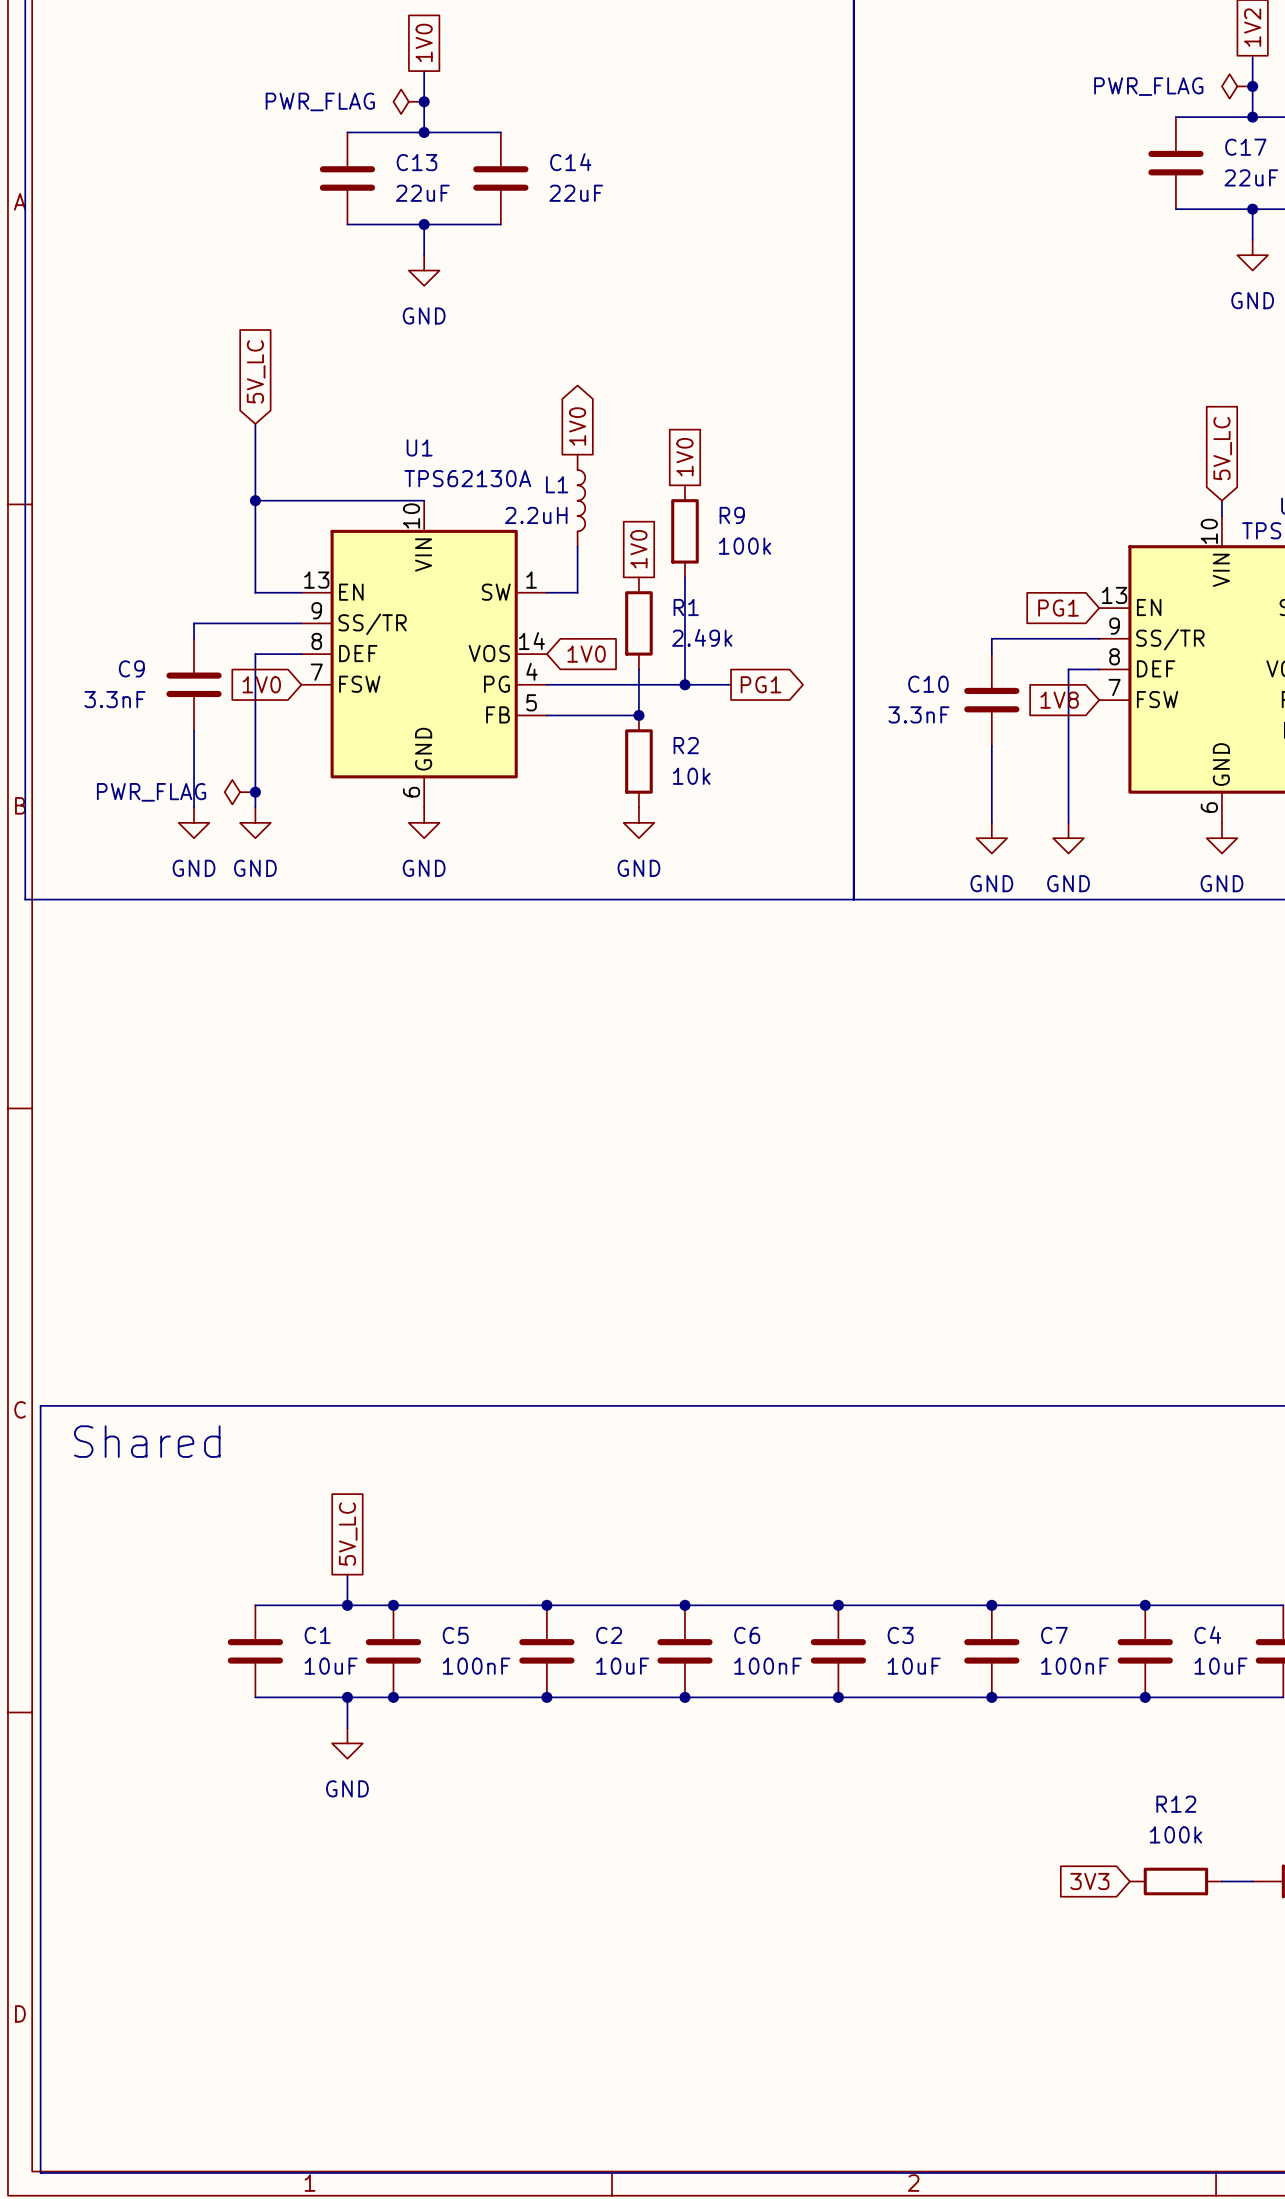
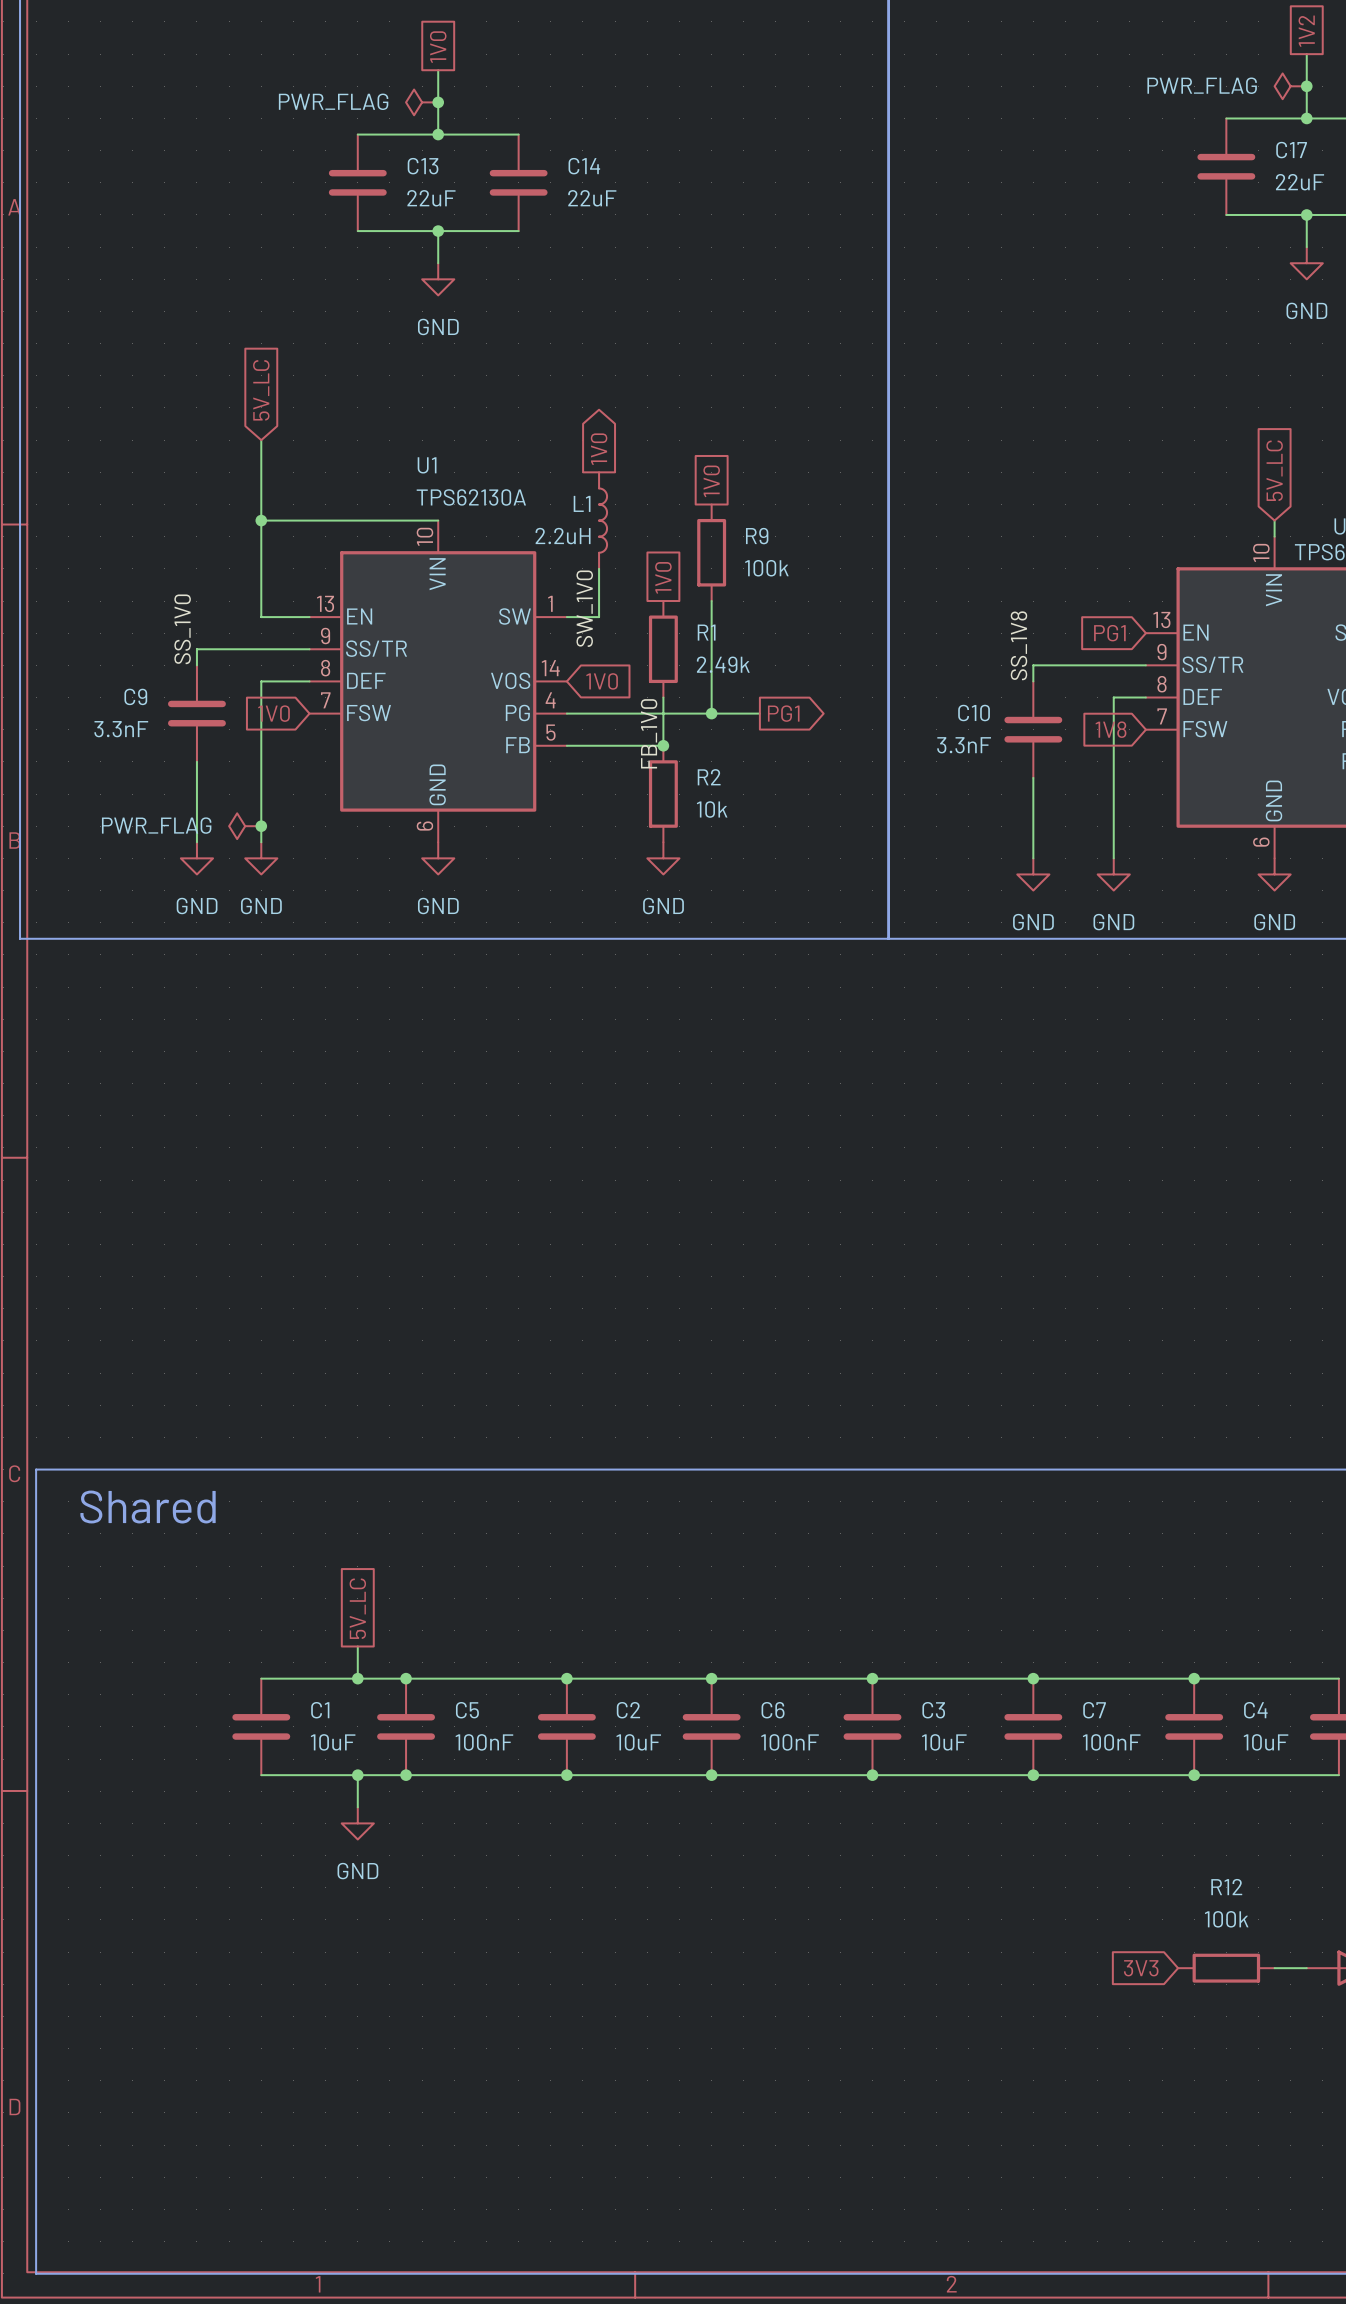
label: none -> SW_1V0 (584, 608)
label: none -> SS_1V0 (182, 629)
label: none -> SS_1V8 (1018, 645)
label: none -> FB_1V0 (649, 733)

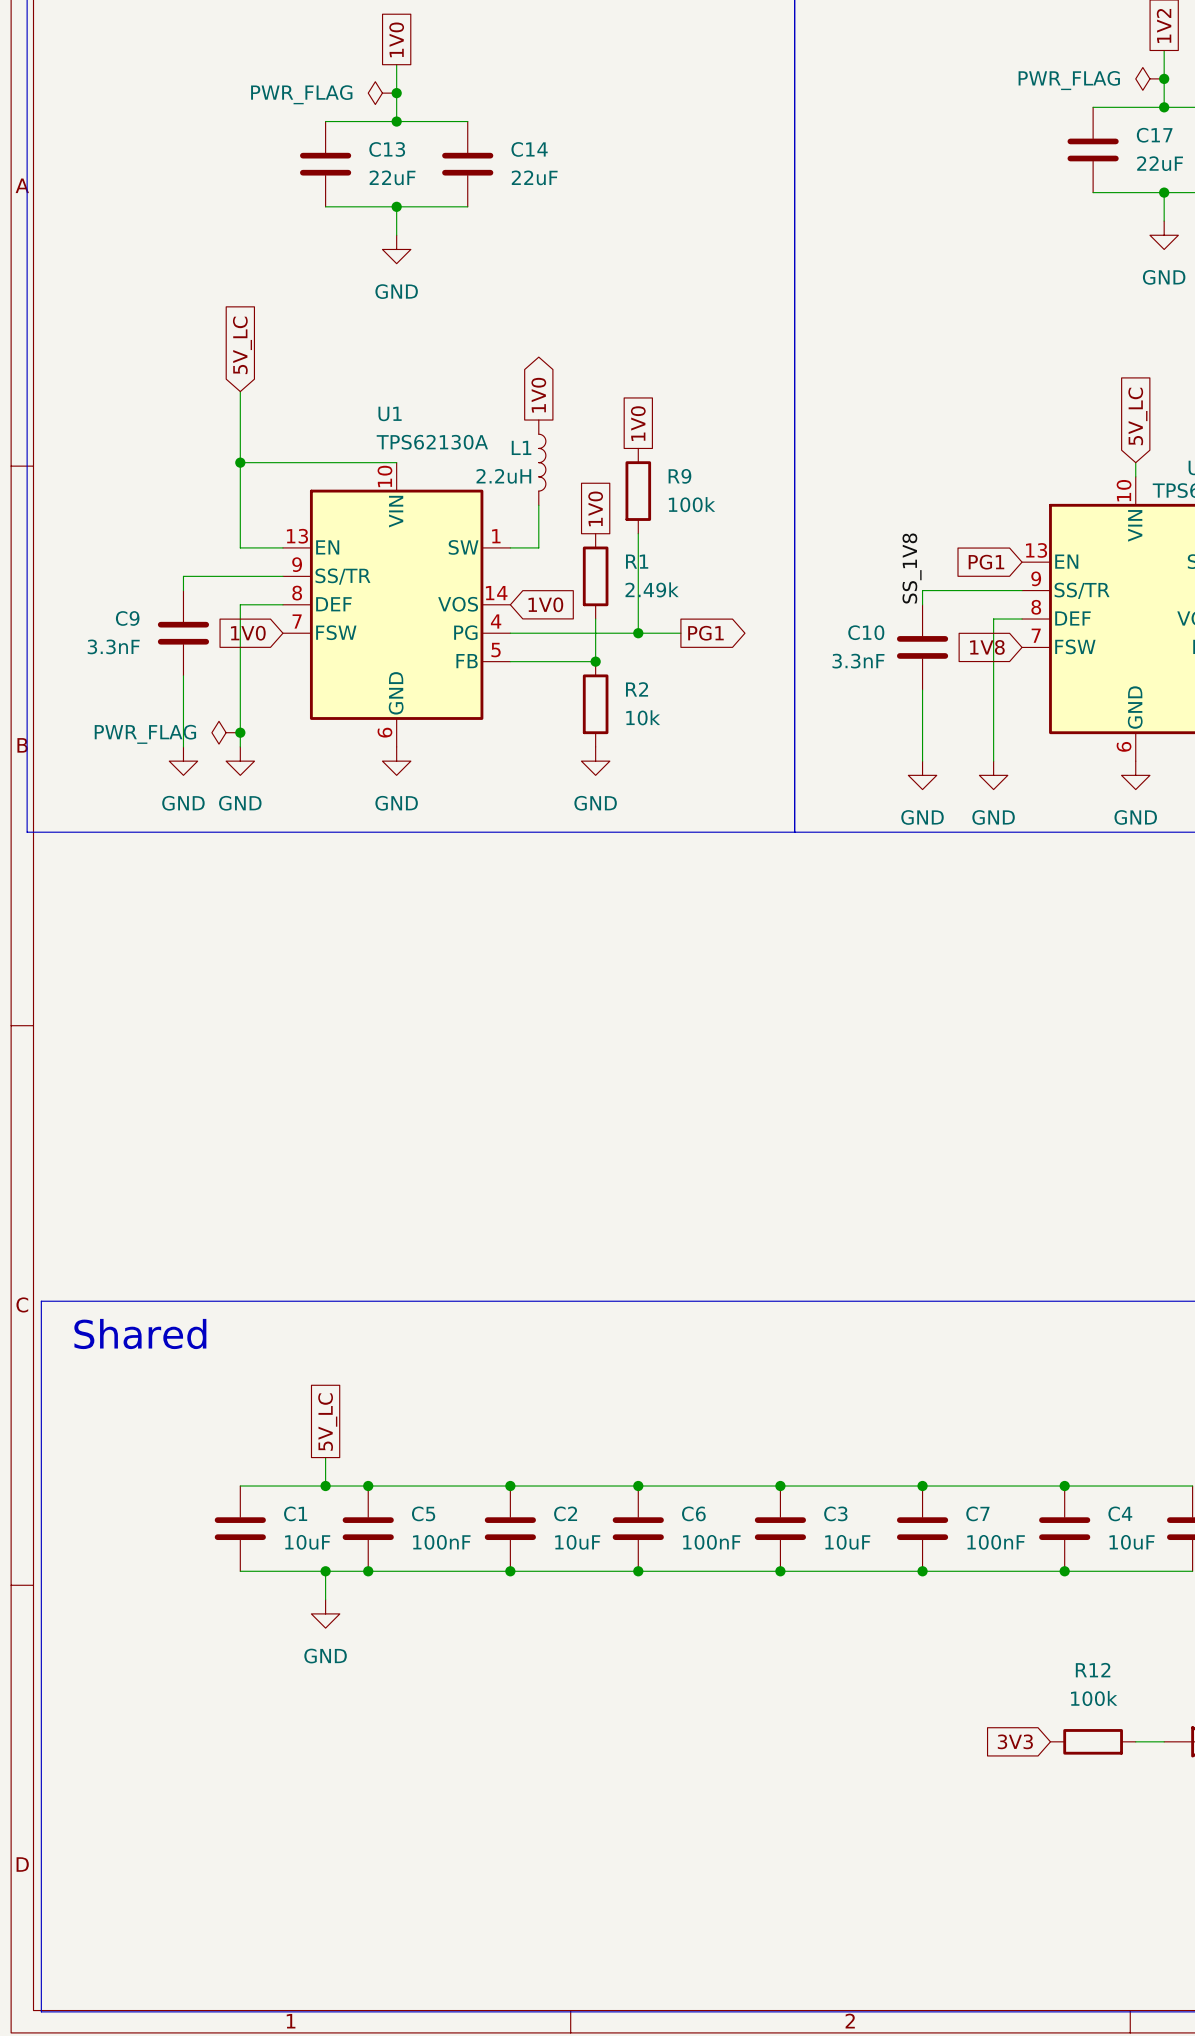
label: SW_1V0 (584, 608) -> none
label: SS_1V0 (182, 629) -> none
label: FB_1V0 (649, 733) -> none

